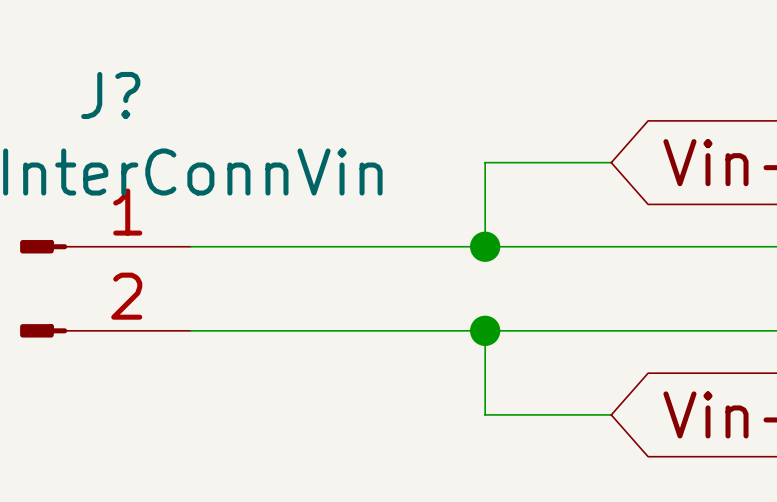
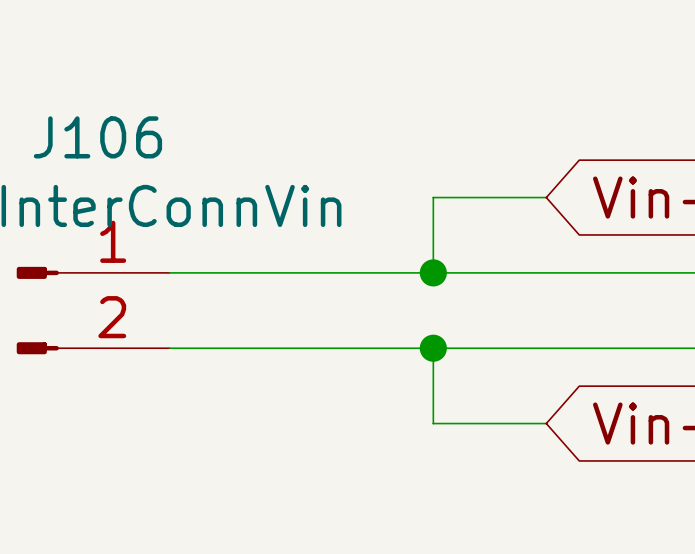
J? name: J? (110, 95) -> J106 (97, 137)

